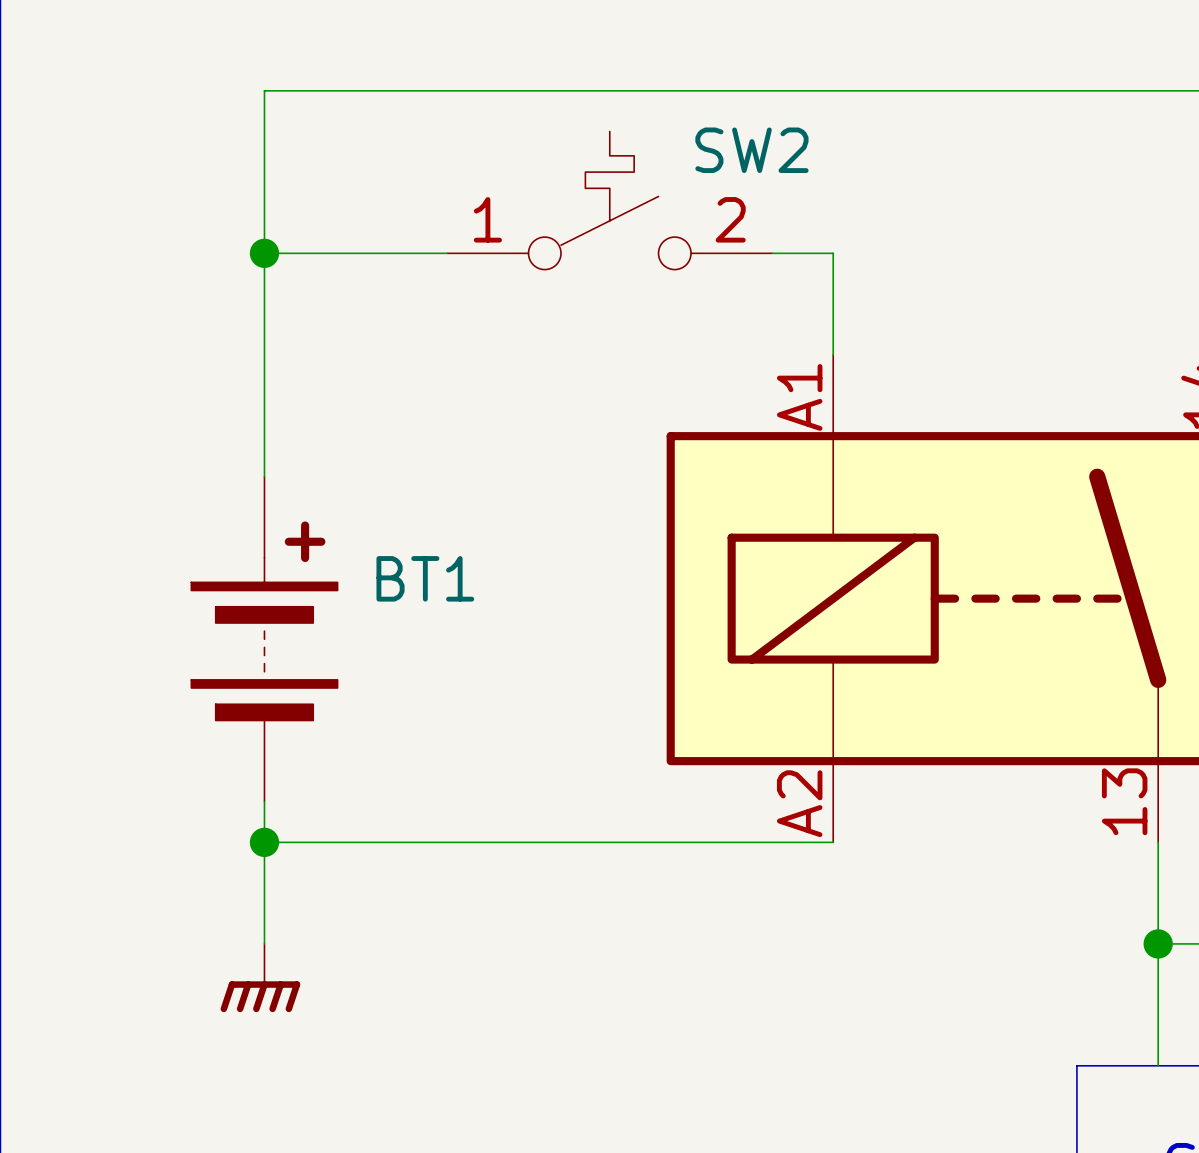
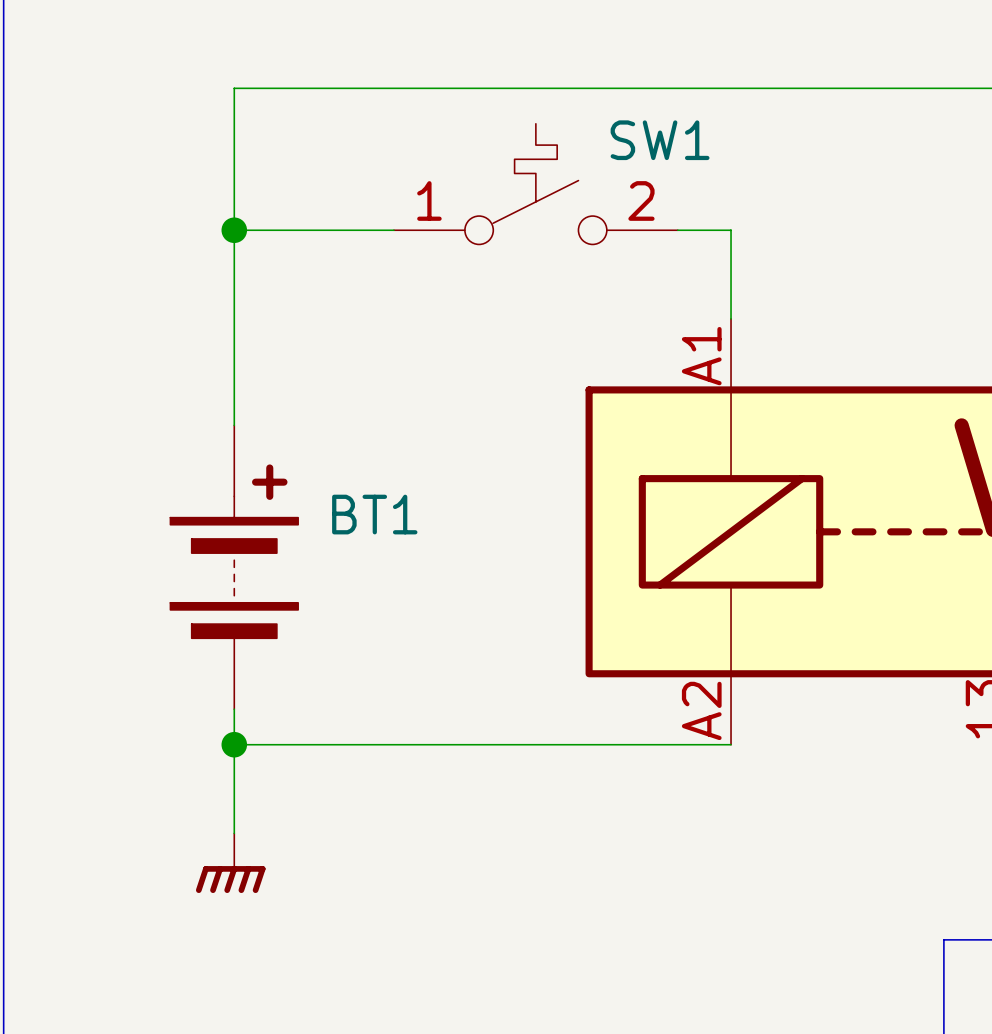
SW2 name: SW2 (751, 150) -> SW1 (660, 140)

